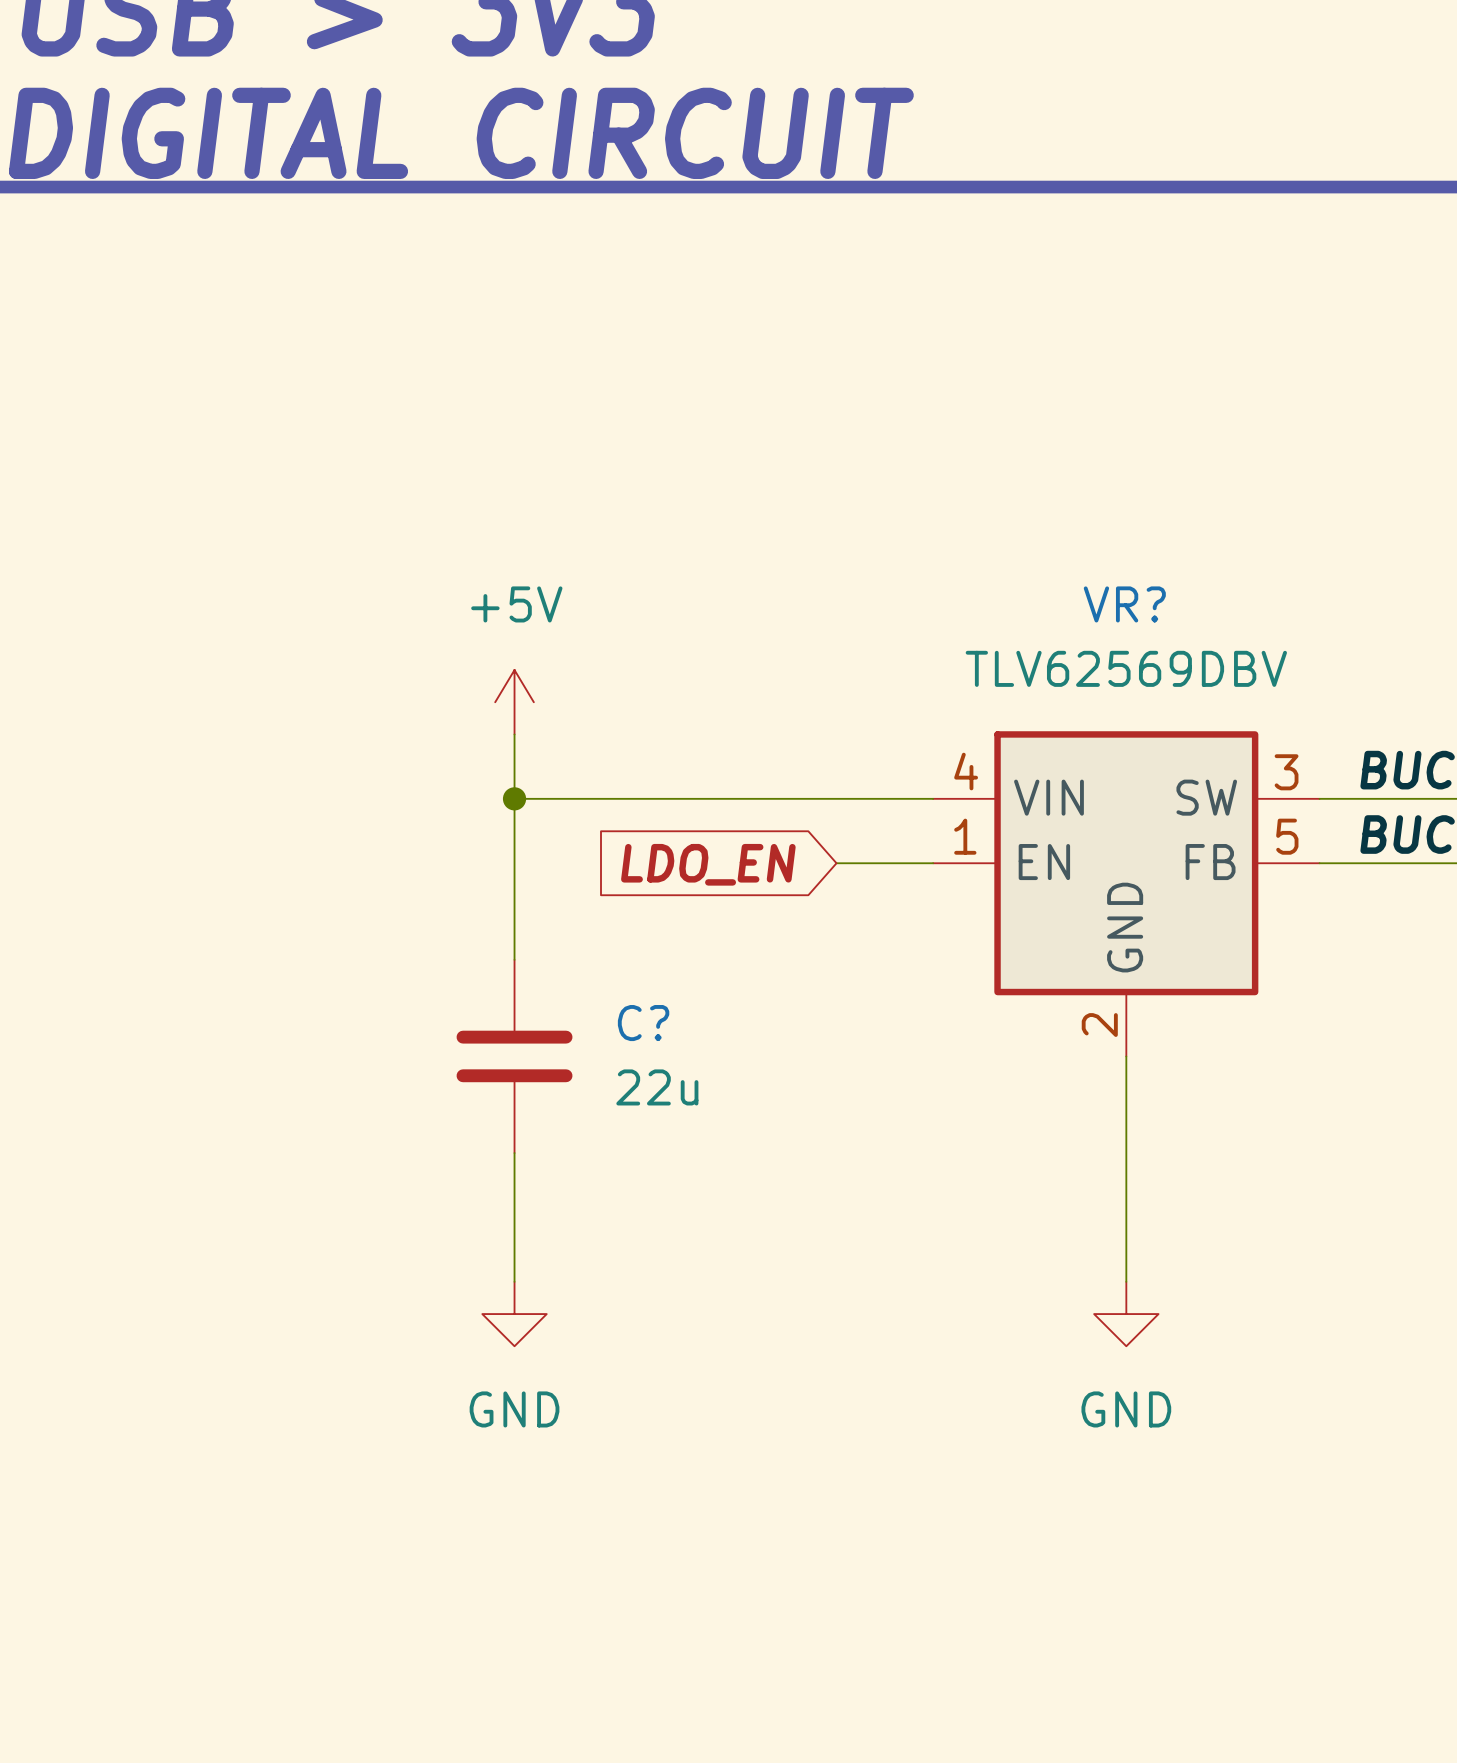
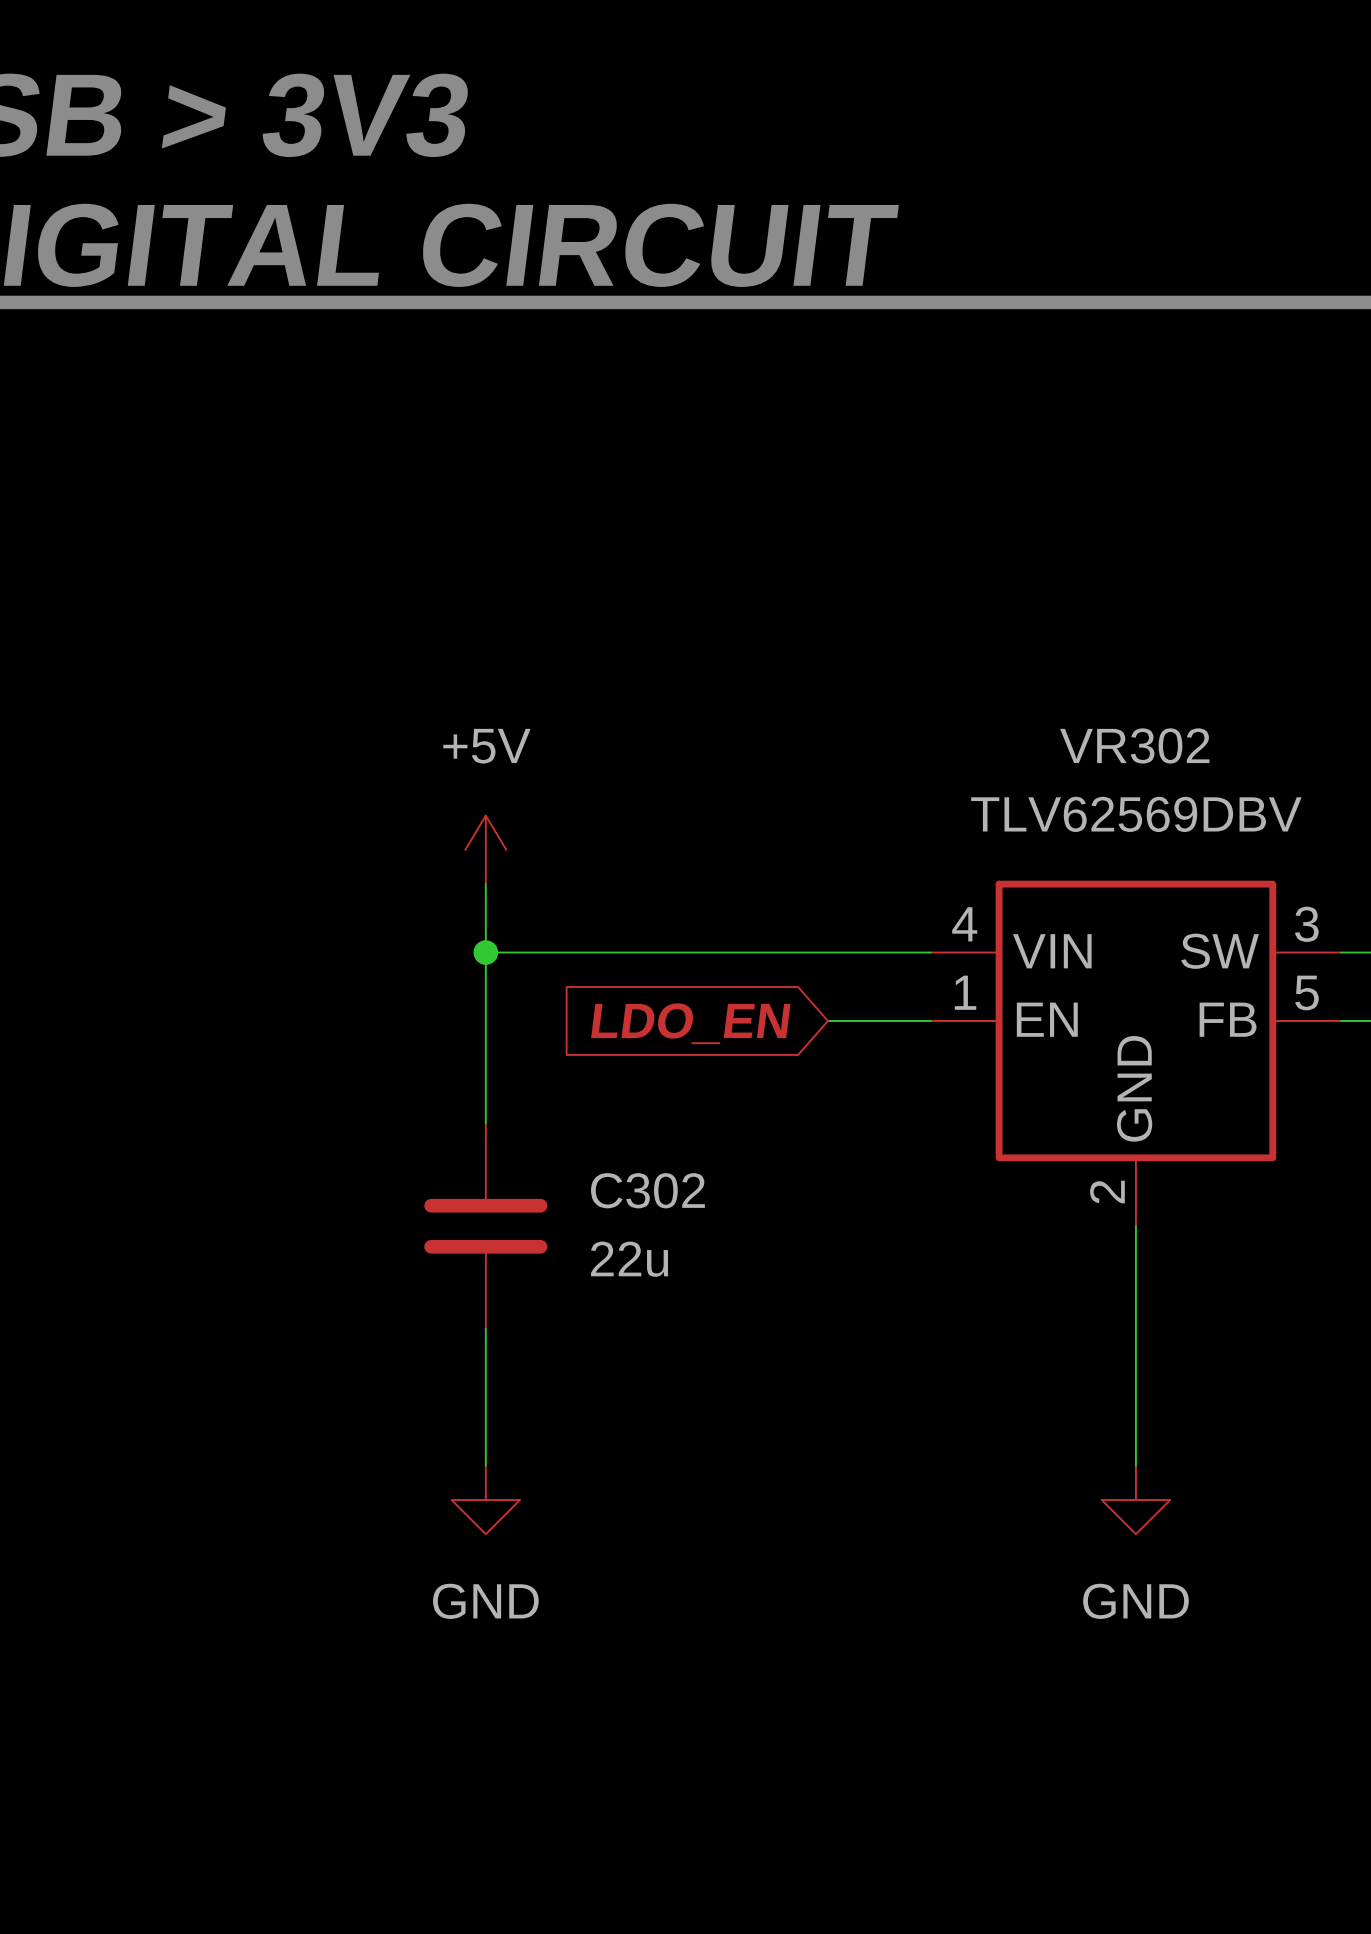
VR? name: VR? (1124, 604) -> VR302 (1134, 745)
C? name: C? (643, 1023) -> C302 (647, 1190)

